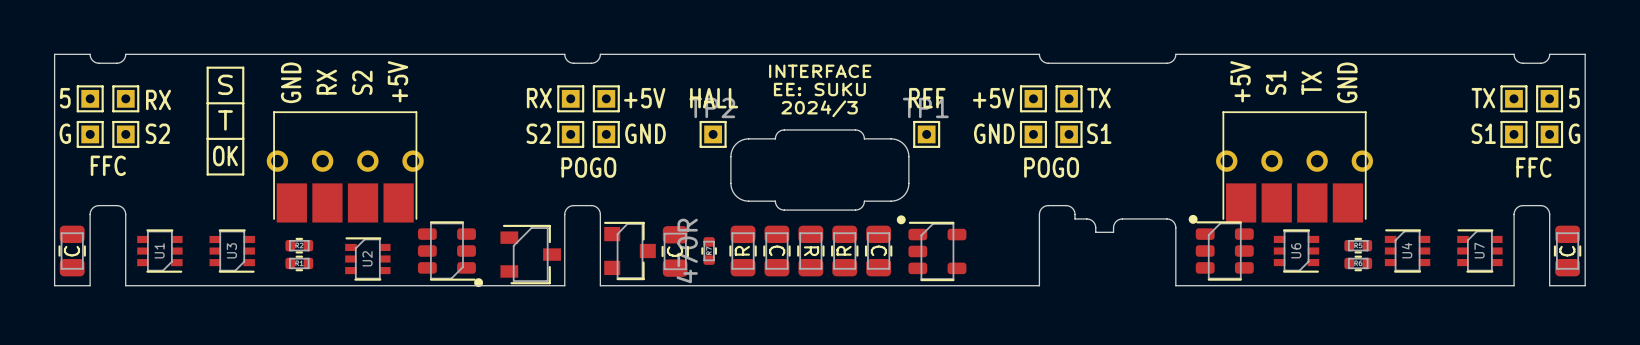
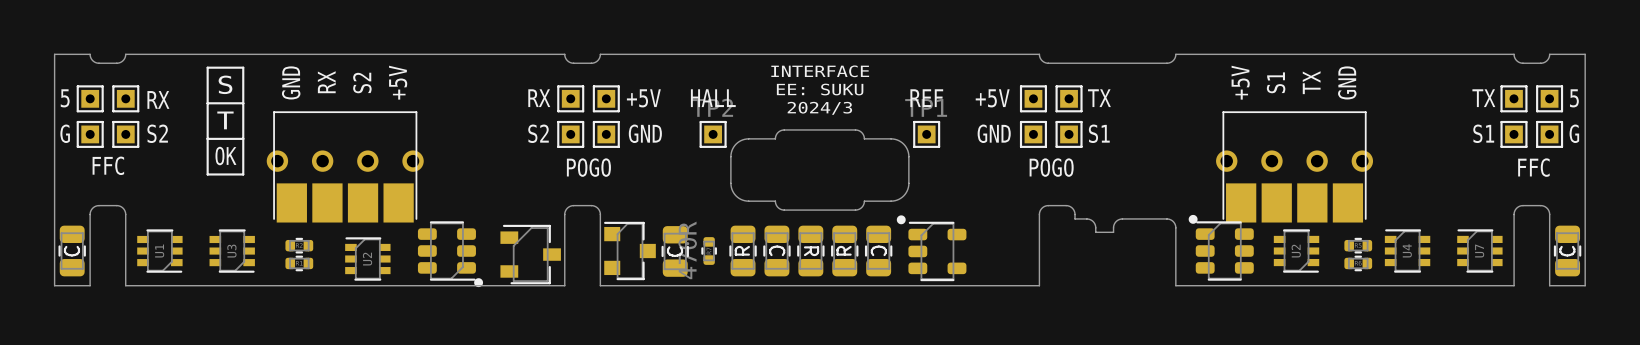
U6 name: U6 (1296, 250) -> U2 (1296, 251)

